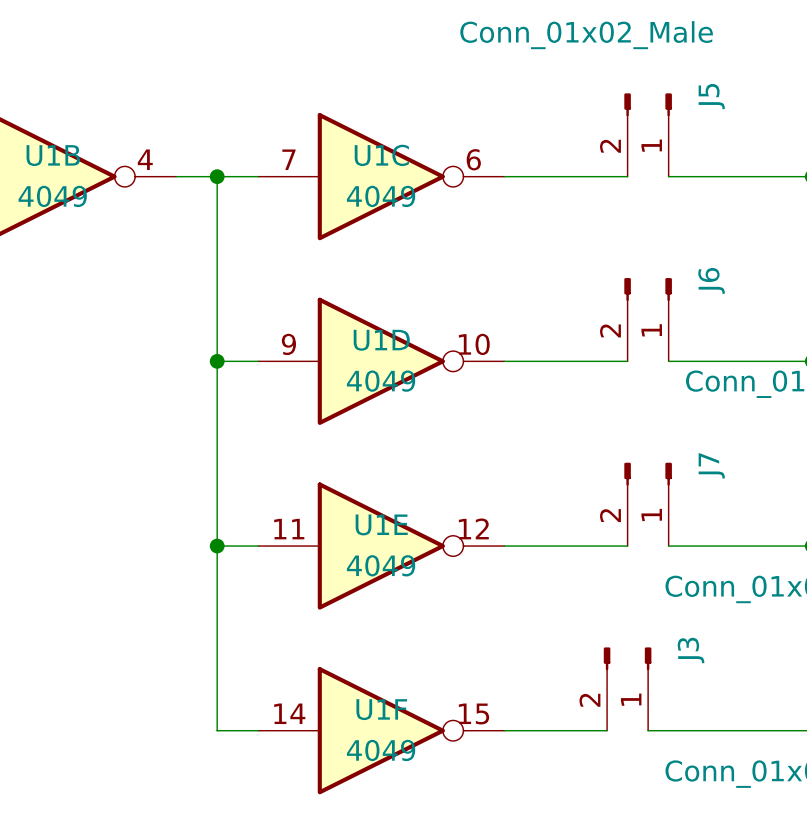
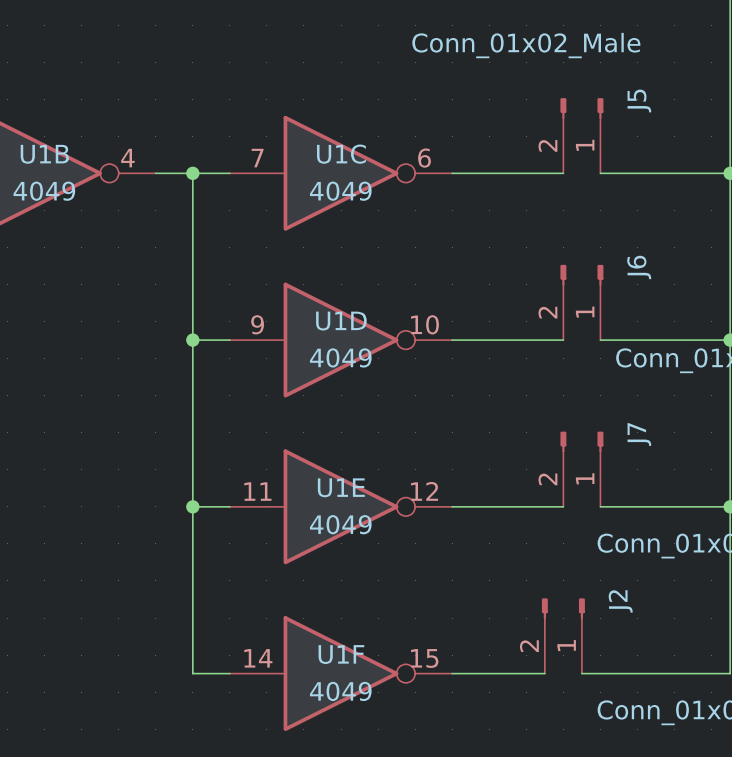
J3 name: J3 (691, 650) -> J2 (620, 601)

